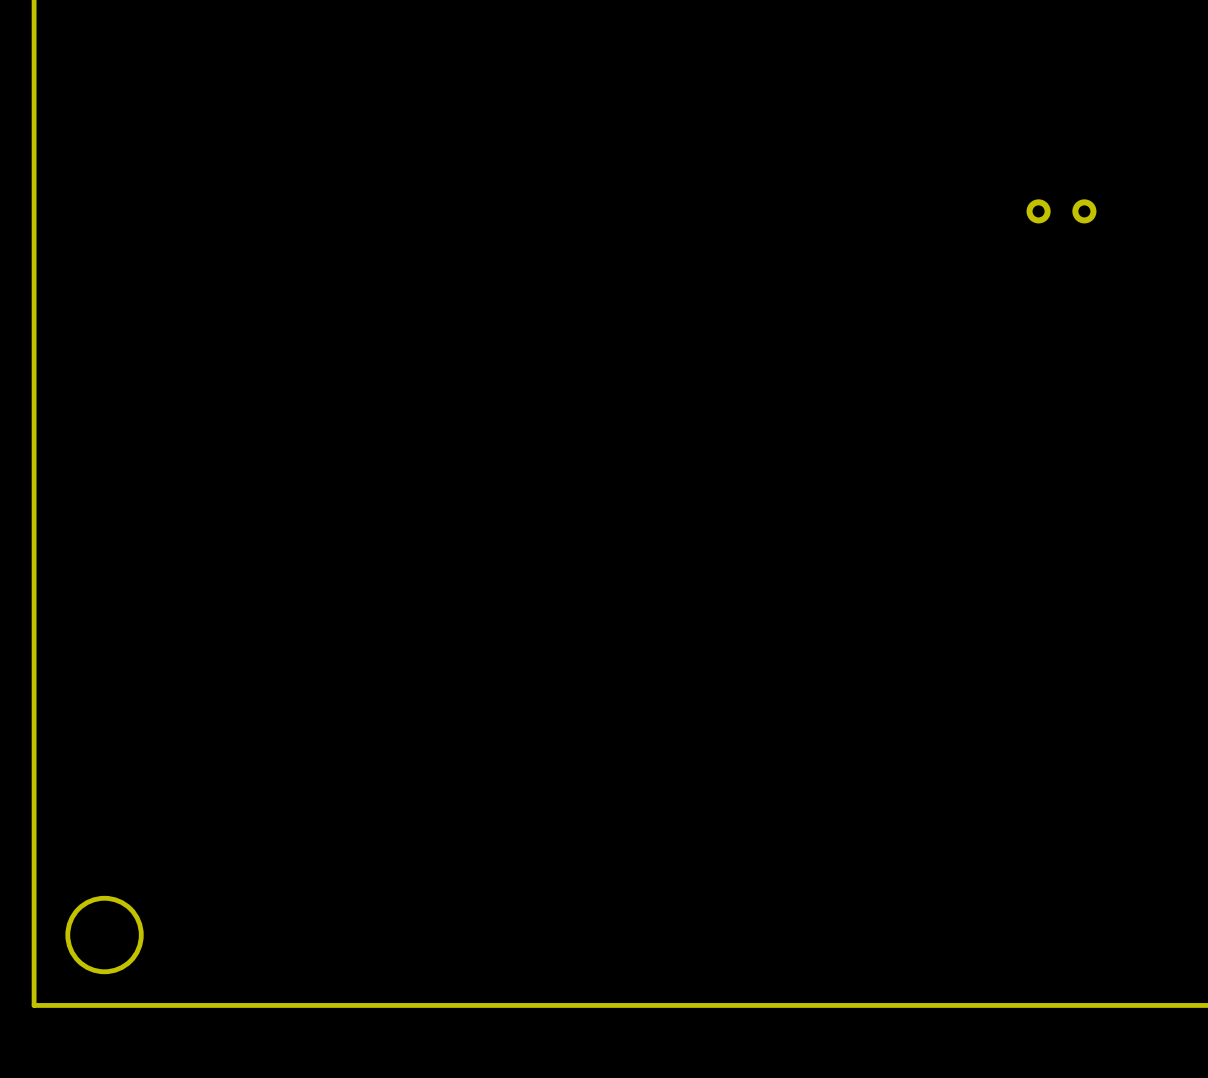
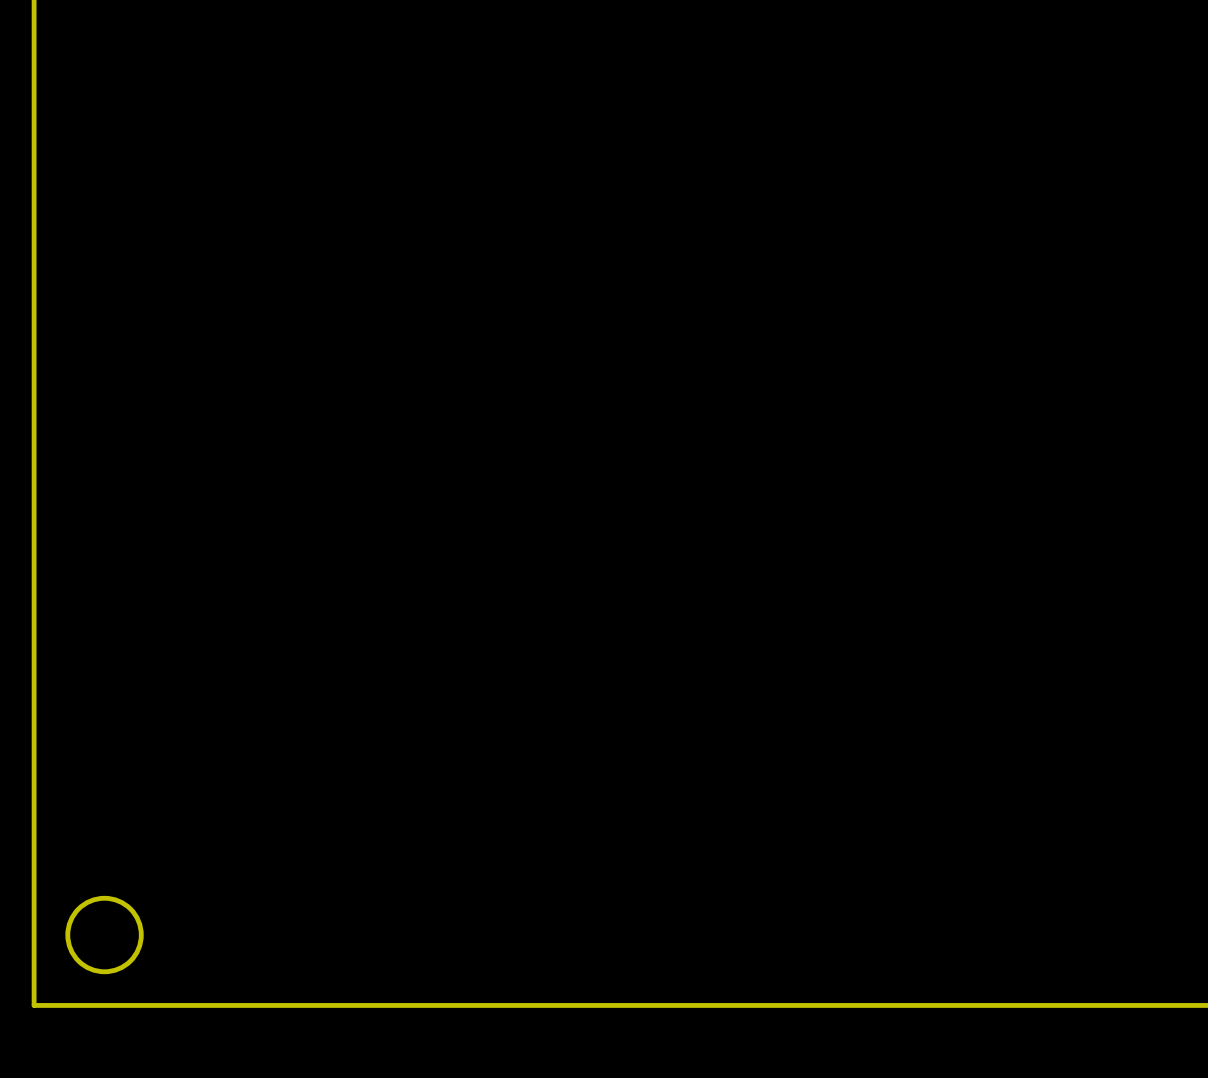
part: (1061, 211) -> none

